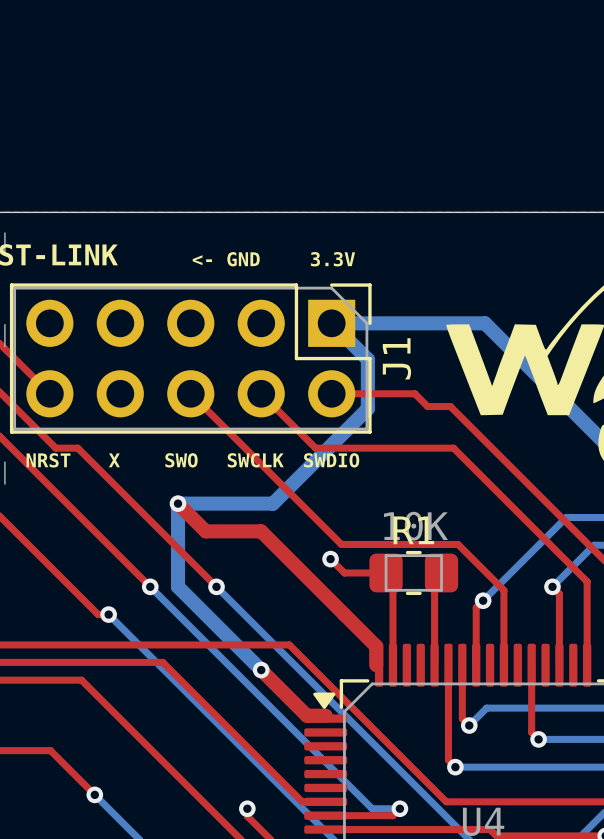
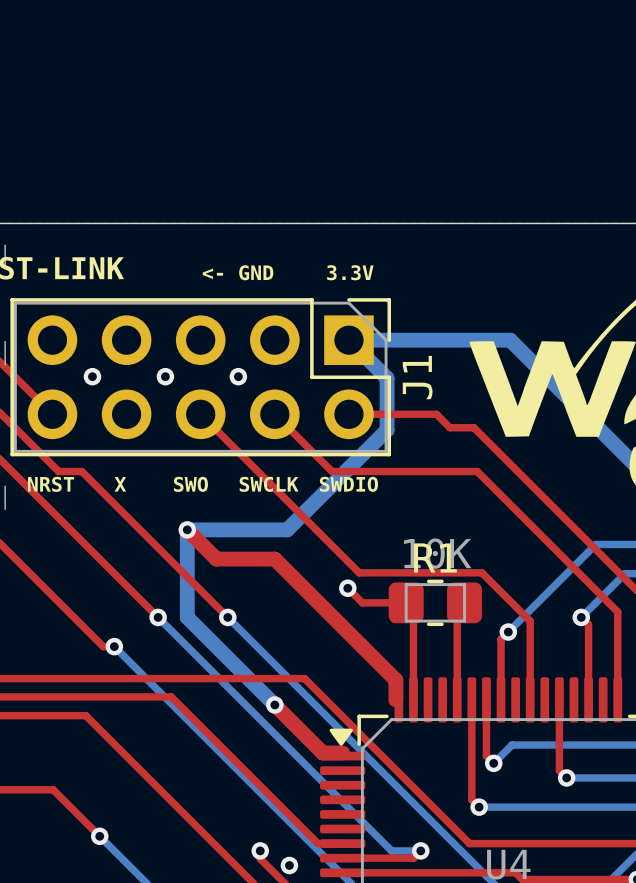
via: none -> (92, 376)
via: none -> (165, 376)
via: none -> (238, 376)
via: none -> (289, 865)

